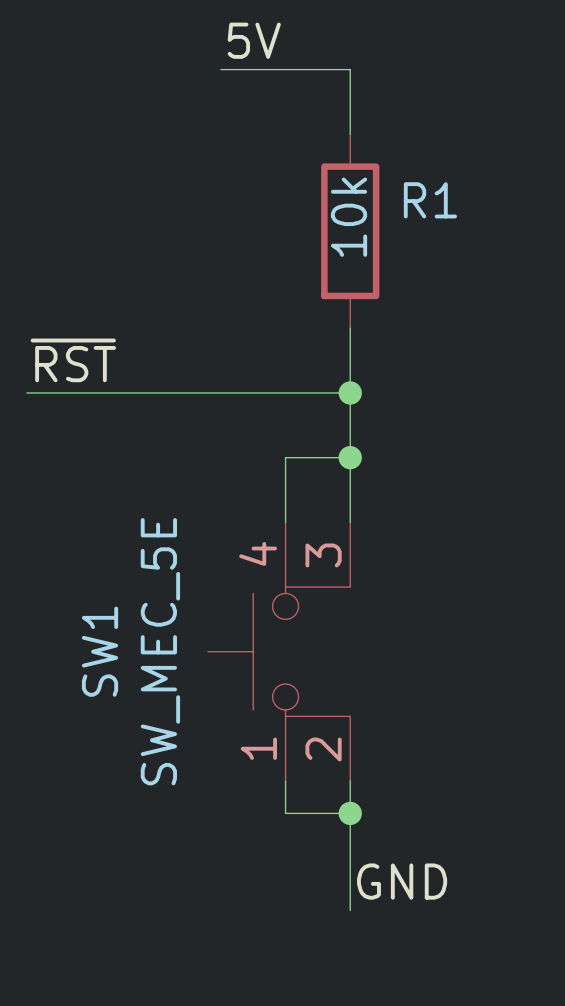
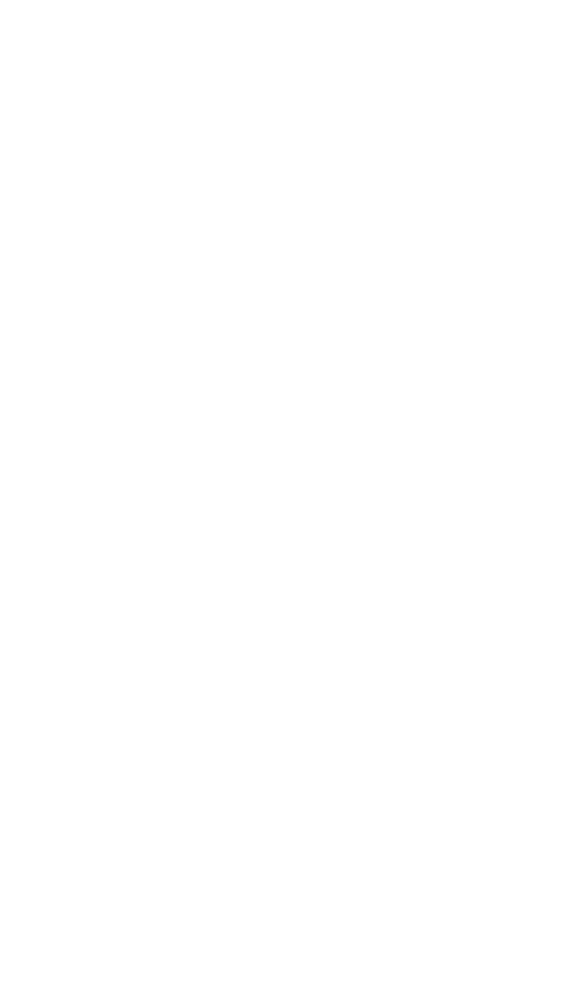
label: 5V (254, 40) -> none
wire: (220, 69) (350, 69) (350, 134) -> none
R1: 10k (350, 231) -> none
wire: (350, 328) (350, 522) -> none
label: ~{RST} (73, 360) -> none
wire: (26, 392) (350, 392) -> none
junction: (350, 392) -> none
wire: (350, 457) (285, 457) (285, 522) -> none
junction: (350, 457) -> none
SW1: SW_MEC_5E (279, 651) -> none
wire: (285, 781) (285, 813) (350, 813) -> none
wire: (350, 781) (350, 910) -> none
junction: (350, 813) -> none
label: GND (402, 881) -> none

